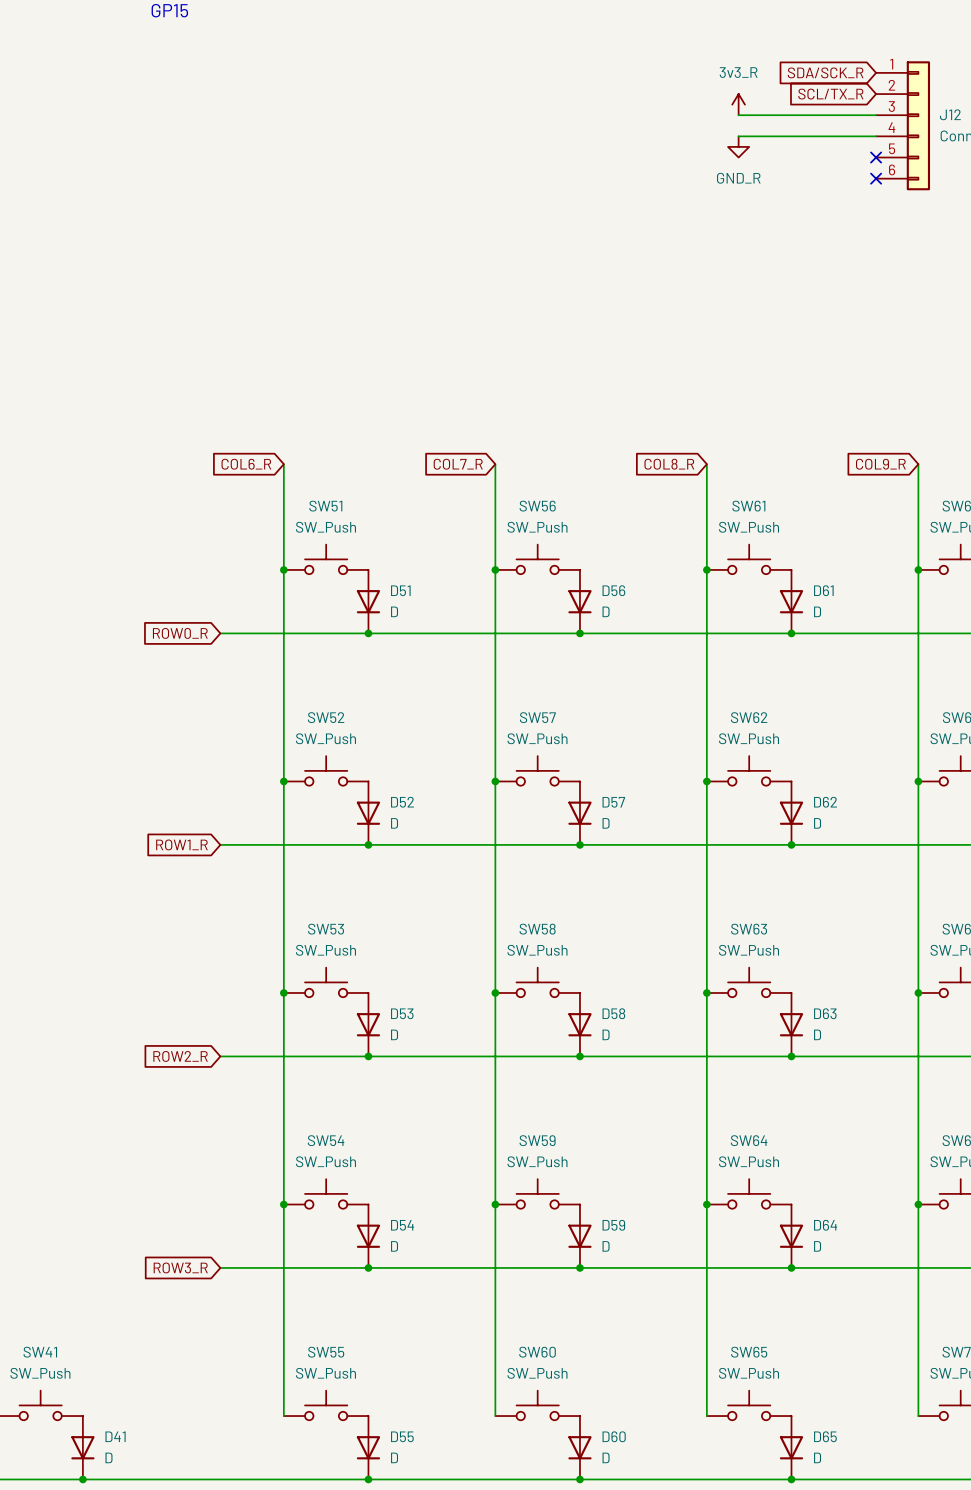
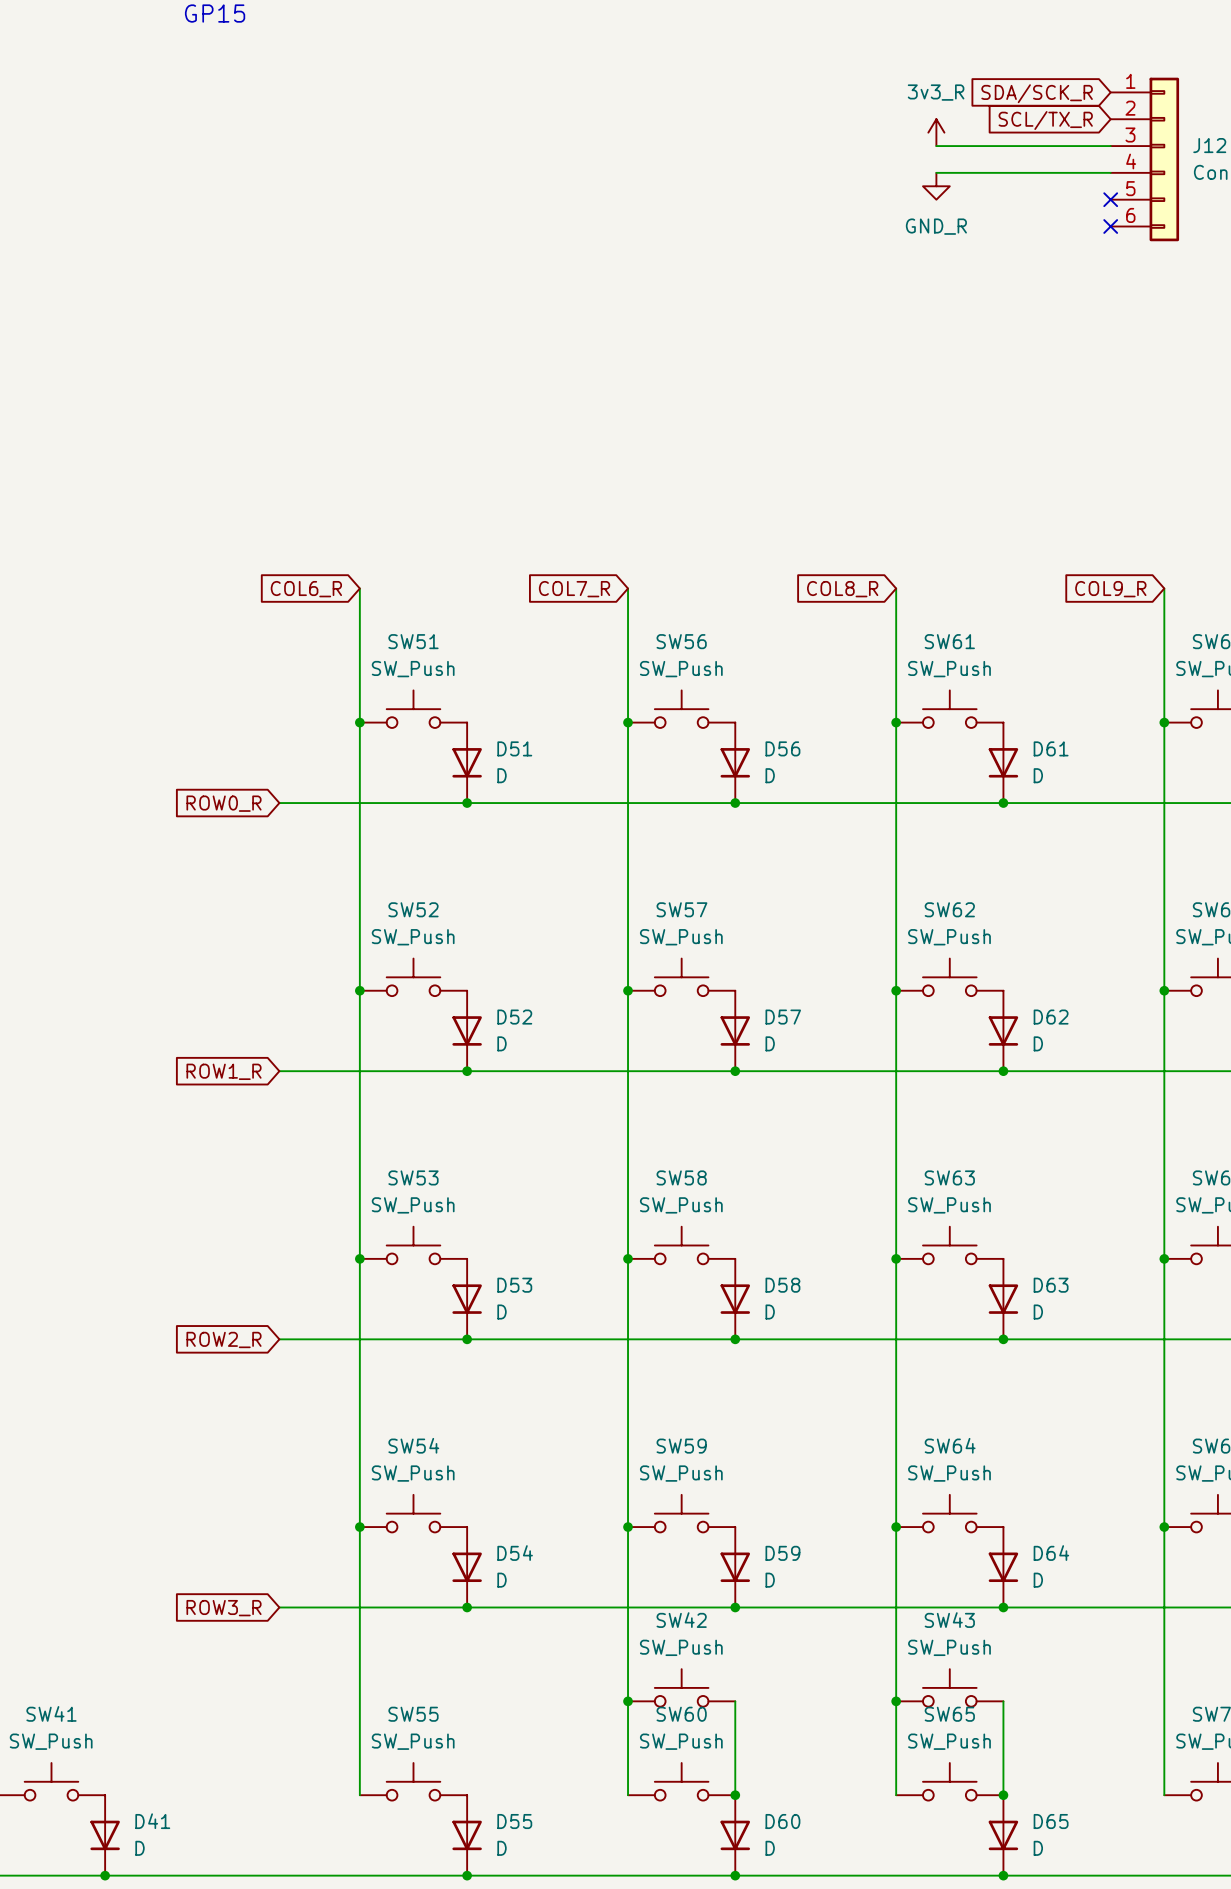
SW42: none -> SW_Push (681, 1687)
SW43: none -> SW_Push (949, 1687)
junction: none -> (628, 1701)
wire: none -> (735, 1701) (735, 1795)
junction: none -> (896, 1701)
wire: none -> (1003, 1701) (1003, 1795)
junction: none -> (735, 1795)
junction: none -> (1003, 1795)

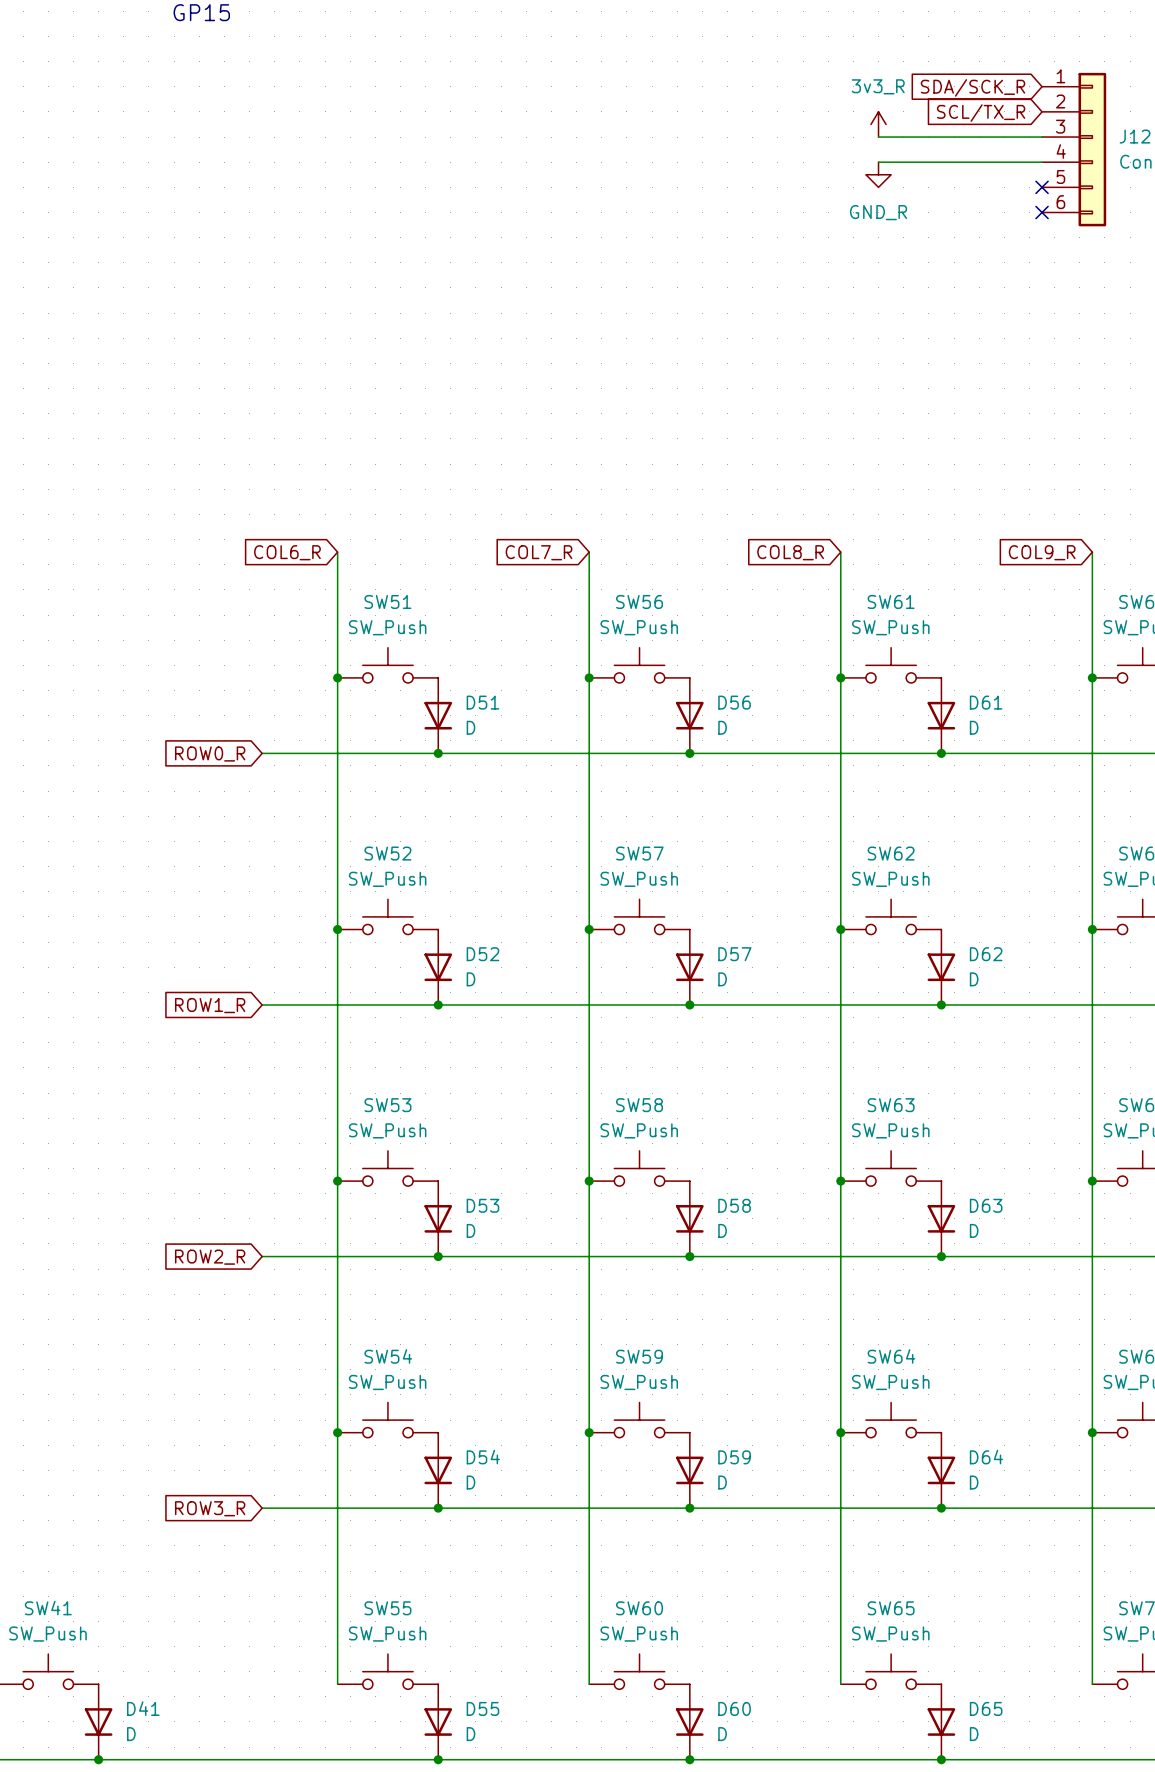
SW42: SW_Push (681, 1687) -> none
SW43: SW_Push (949, 1687) -> none
junction: (628, 1701) -> none
wire: (735, 1701) (735, 1795) -> none
junction: (896, 1701) -> none
wire: (1003, 1701) (1003, 1795) -> none
junction: (735, 1795) -> none
junction: (1003, 1795) -> none

